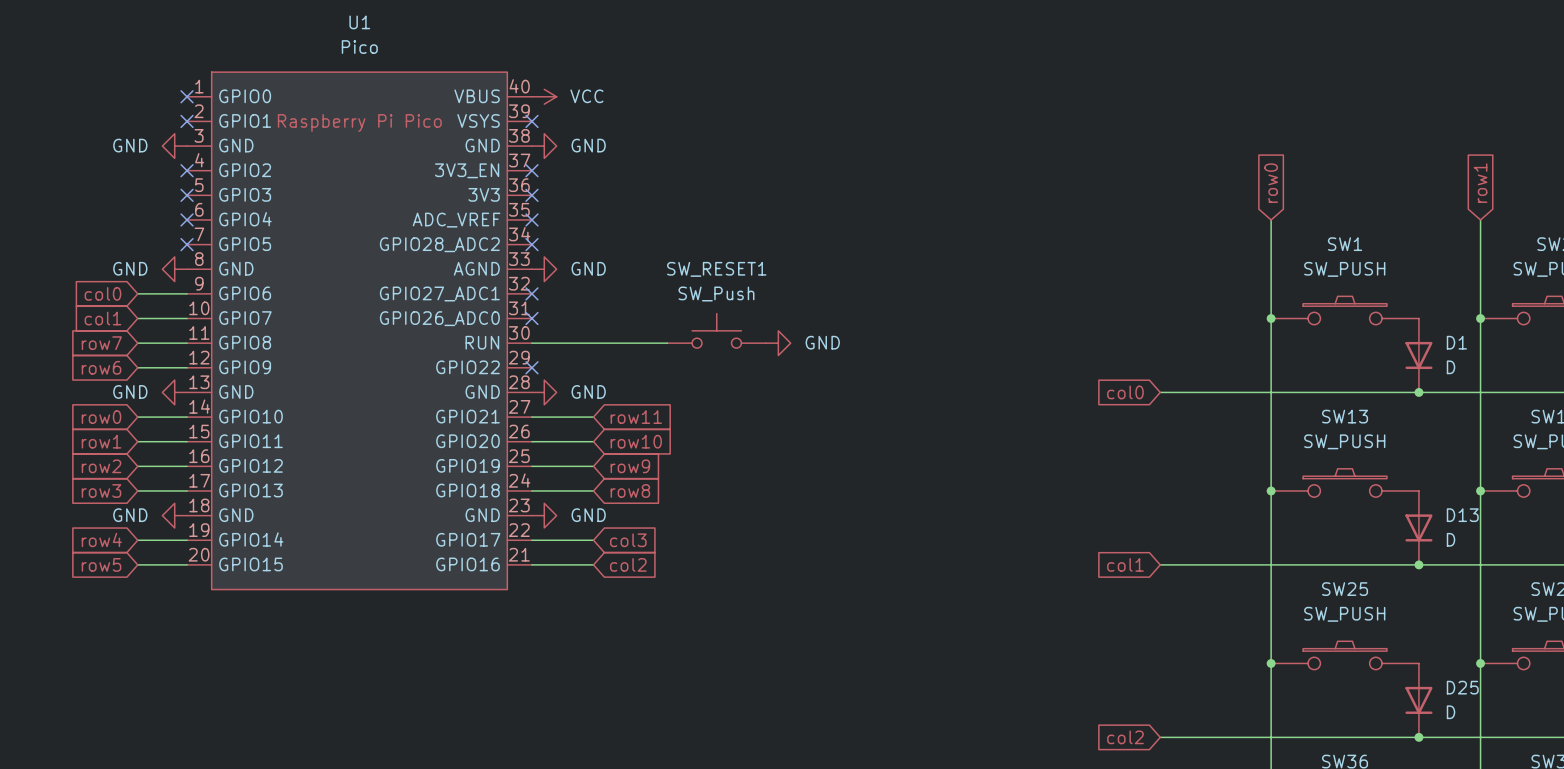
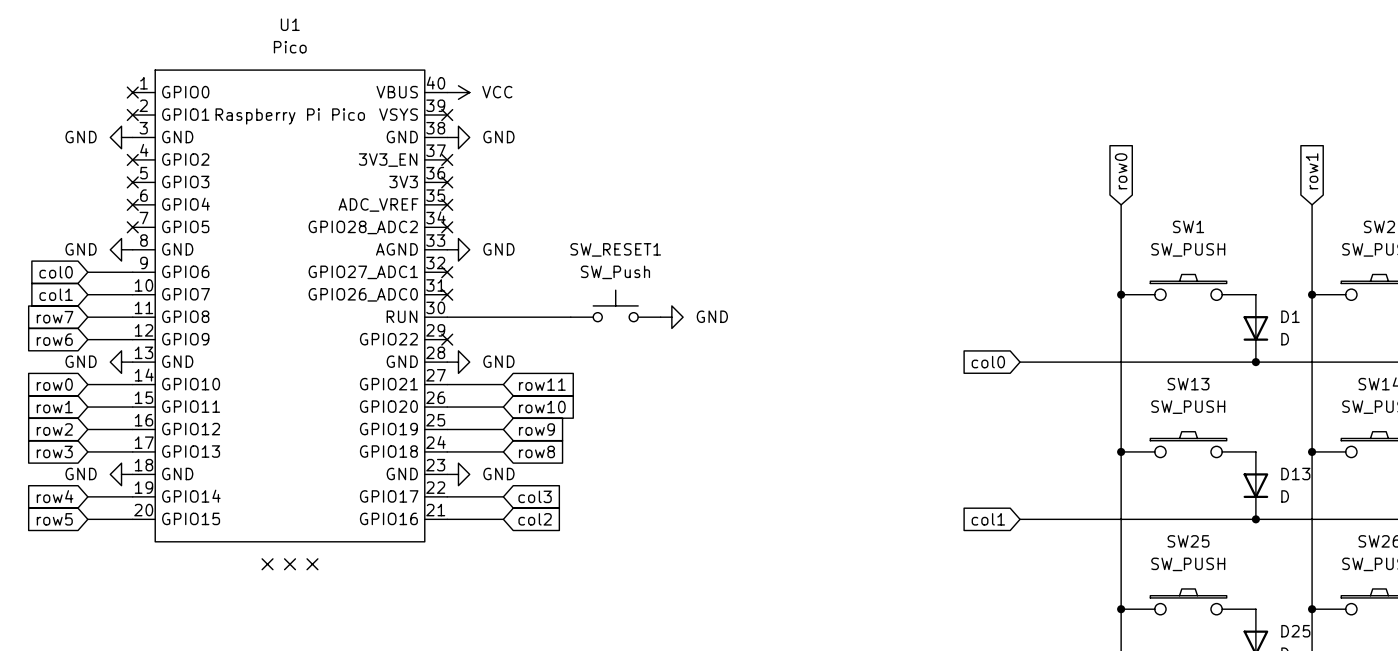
no-connect mark: none -> (267, 564)
no-connect mark: none -> (290, 564)
no-connect mark: none -> (312, 564)

